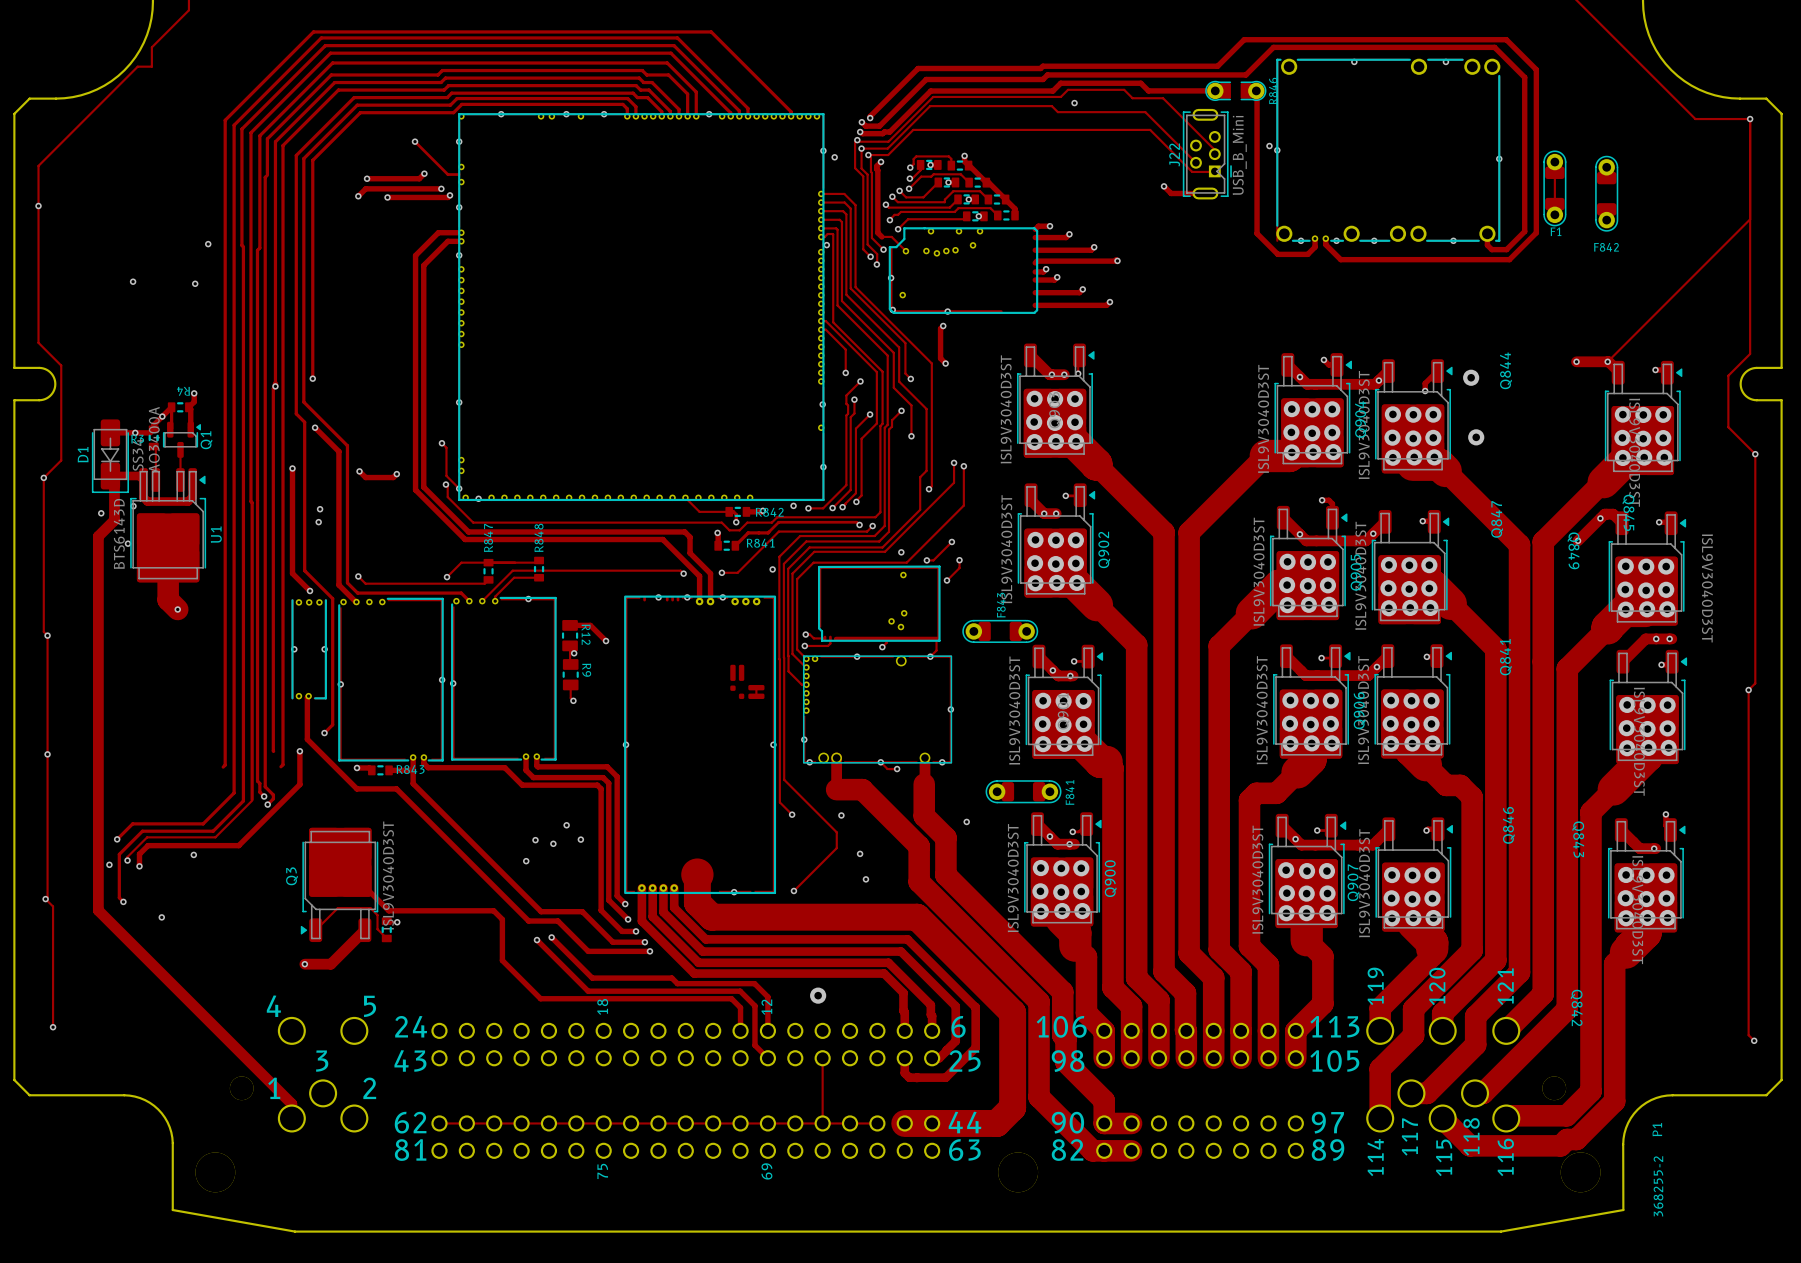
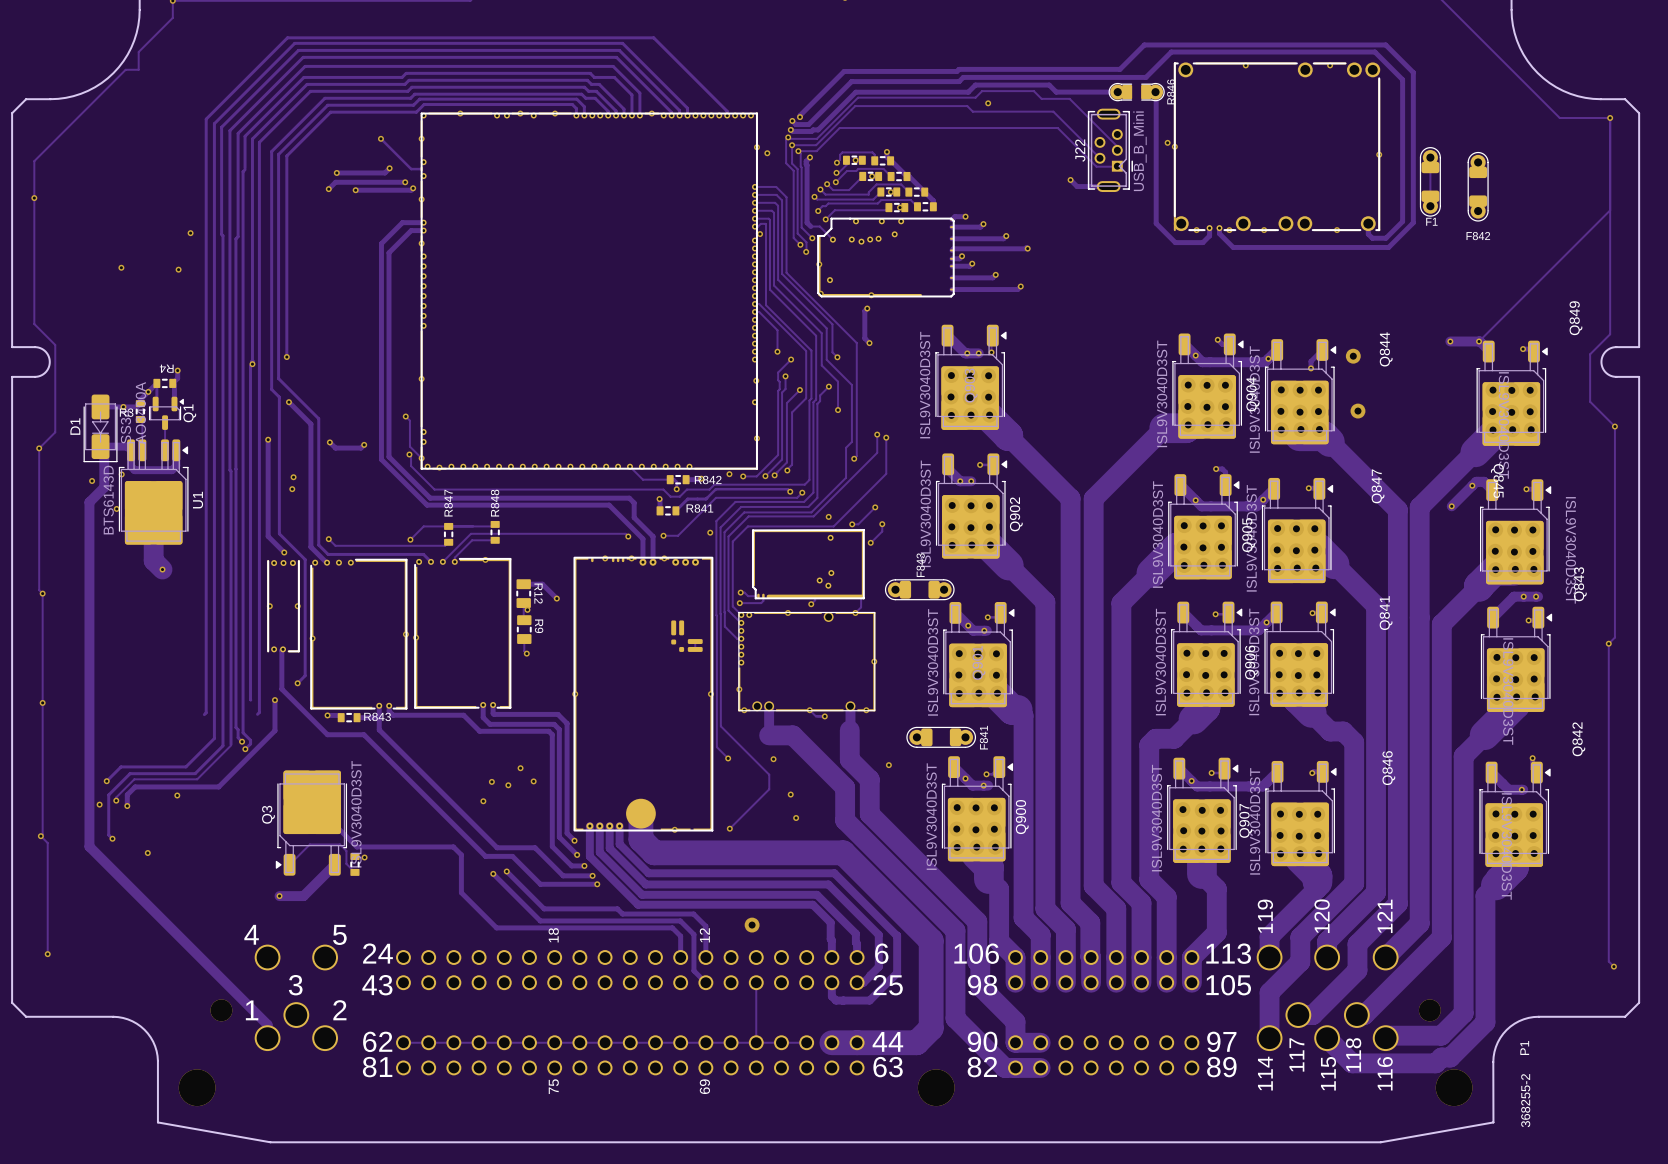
Q849 name rotation: 0° (1573, 550) -> 180° (1575, 318)
Q849 name position: Q849 (1573, 550) -> Q849 (1575, 318)
Q843 name rotation: 0° (1578, 839) -> 180° (1580, 584)
Q843 name position: Q843 (1578, 839) -> Q843 (1580, 584)
Q842 name rotation: 0° (1576, 1007) -> 180° (1578, 739)
Q842 name position: Q842 (1576, 1007) -> Q842 (1578, 739)

